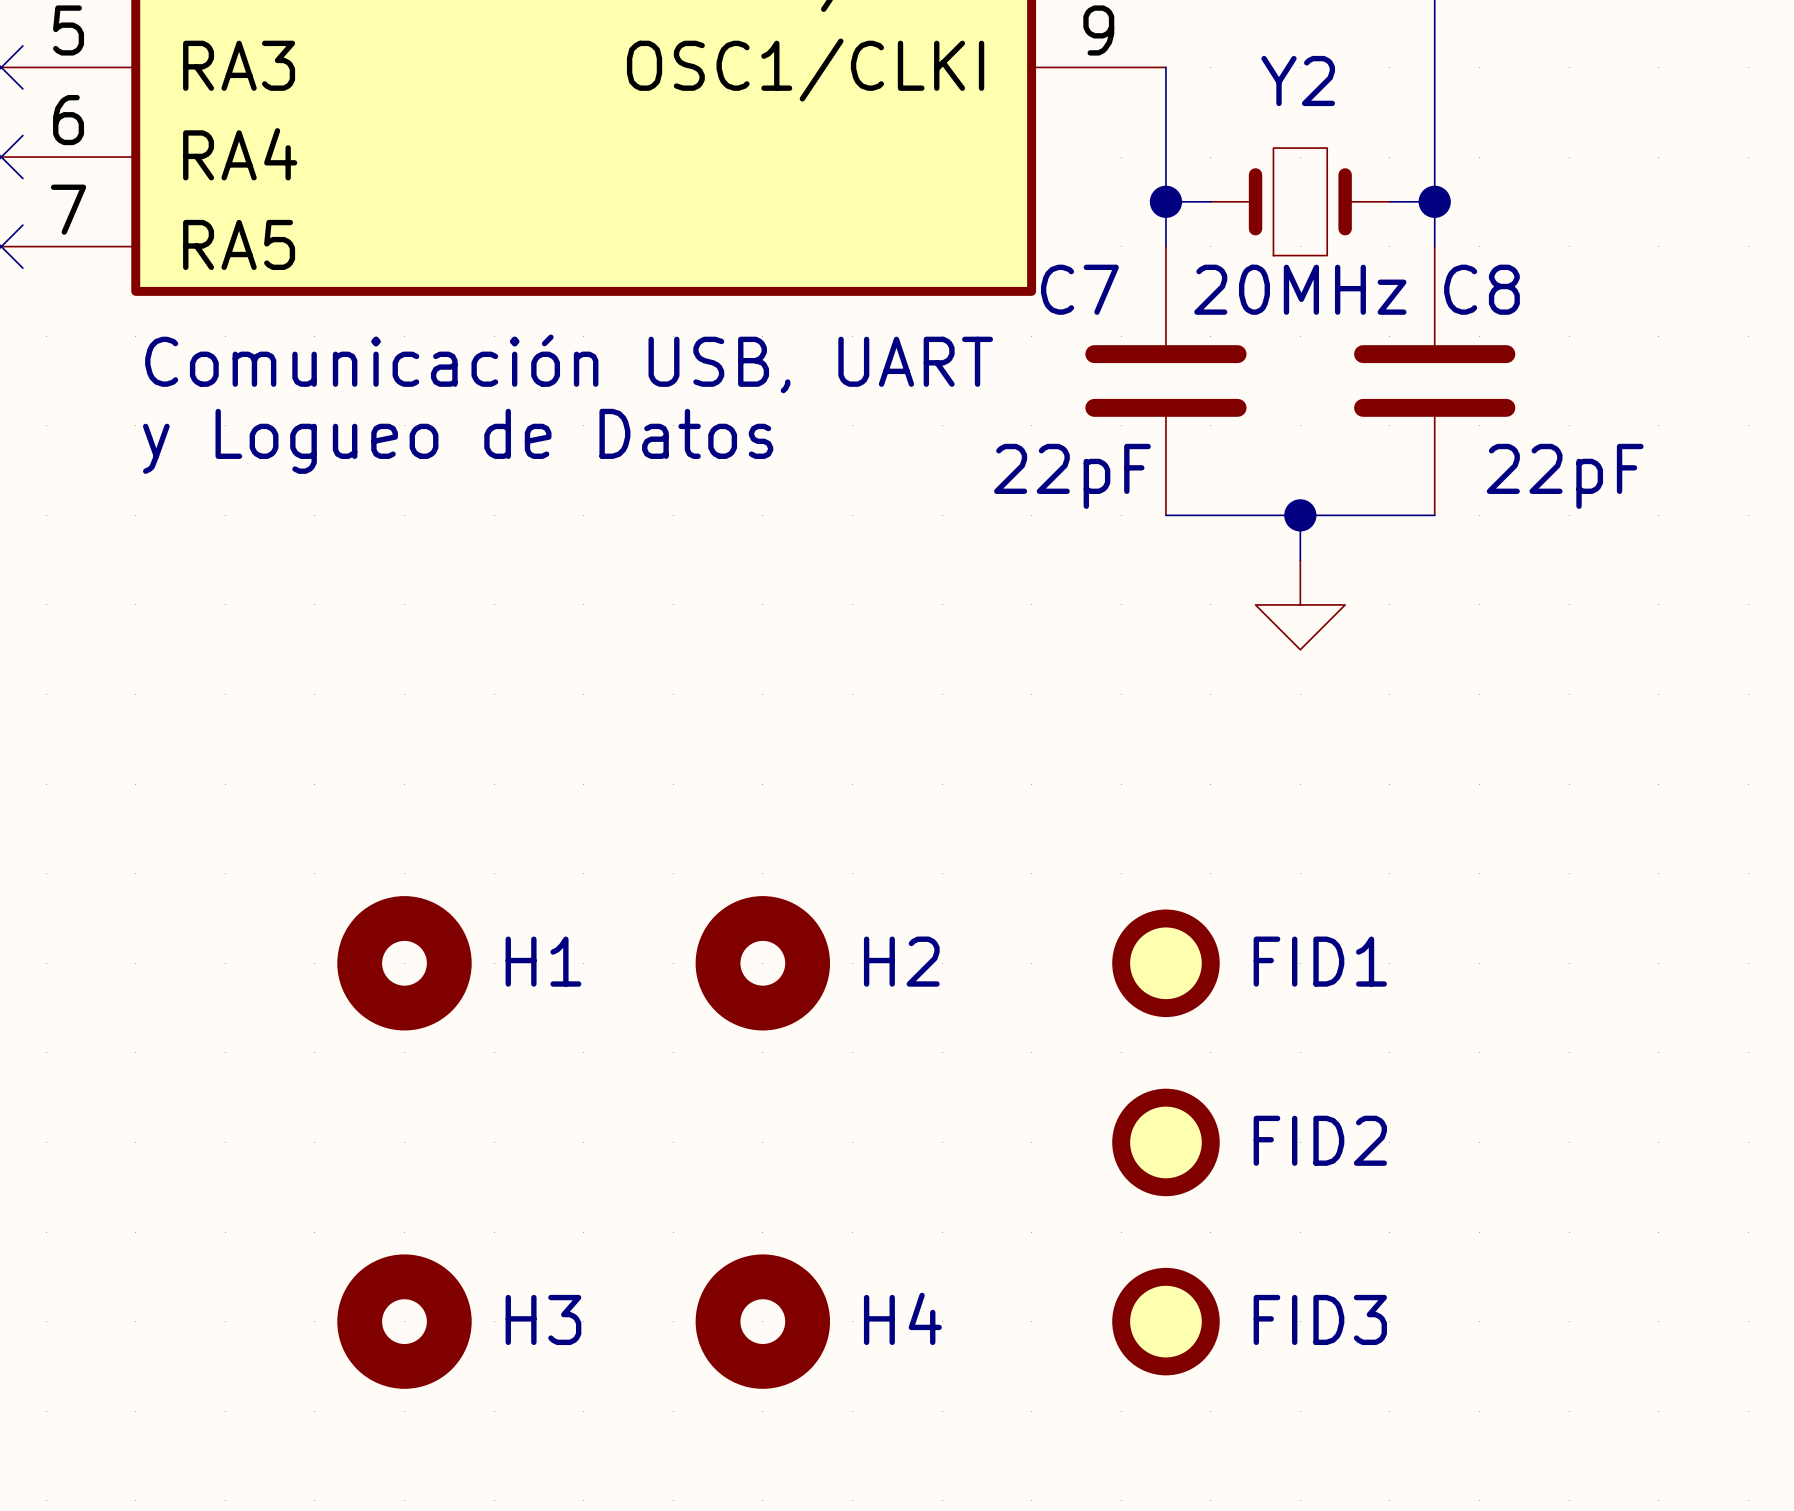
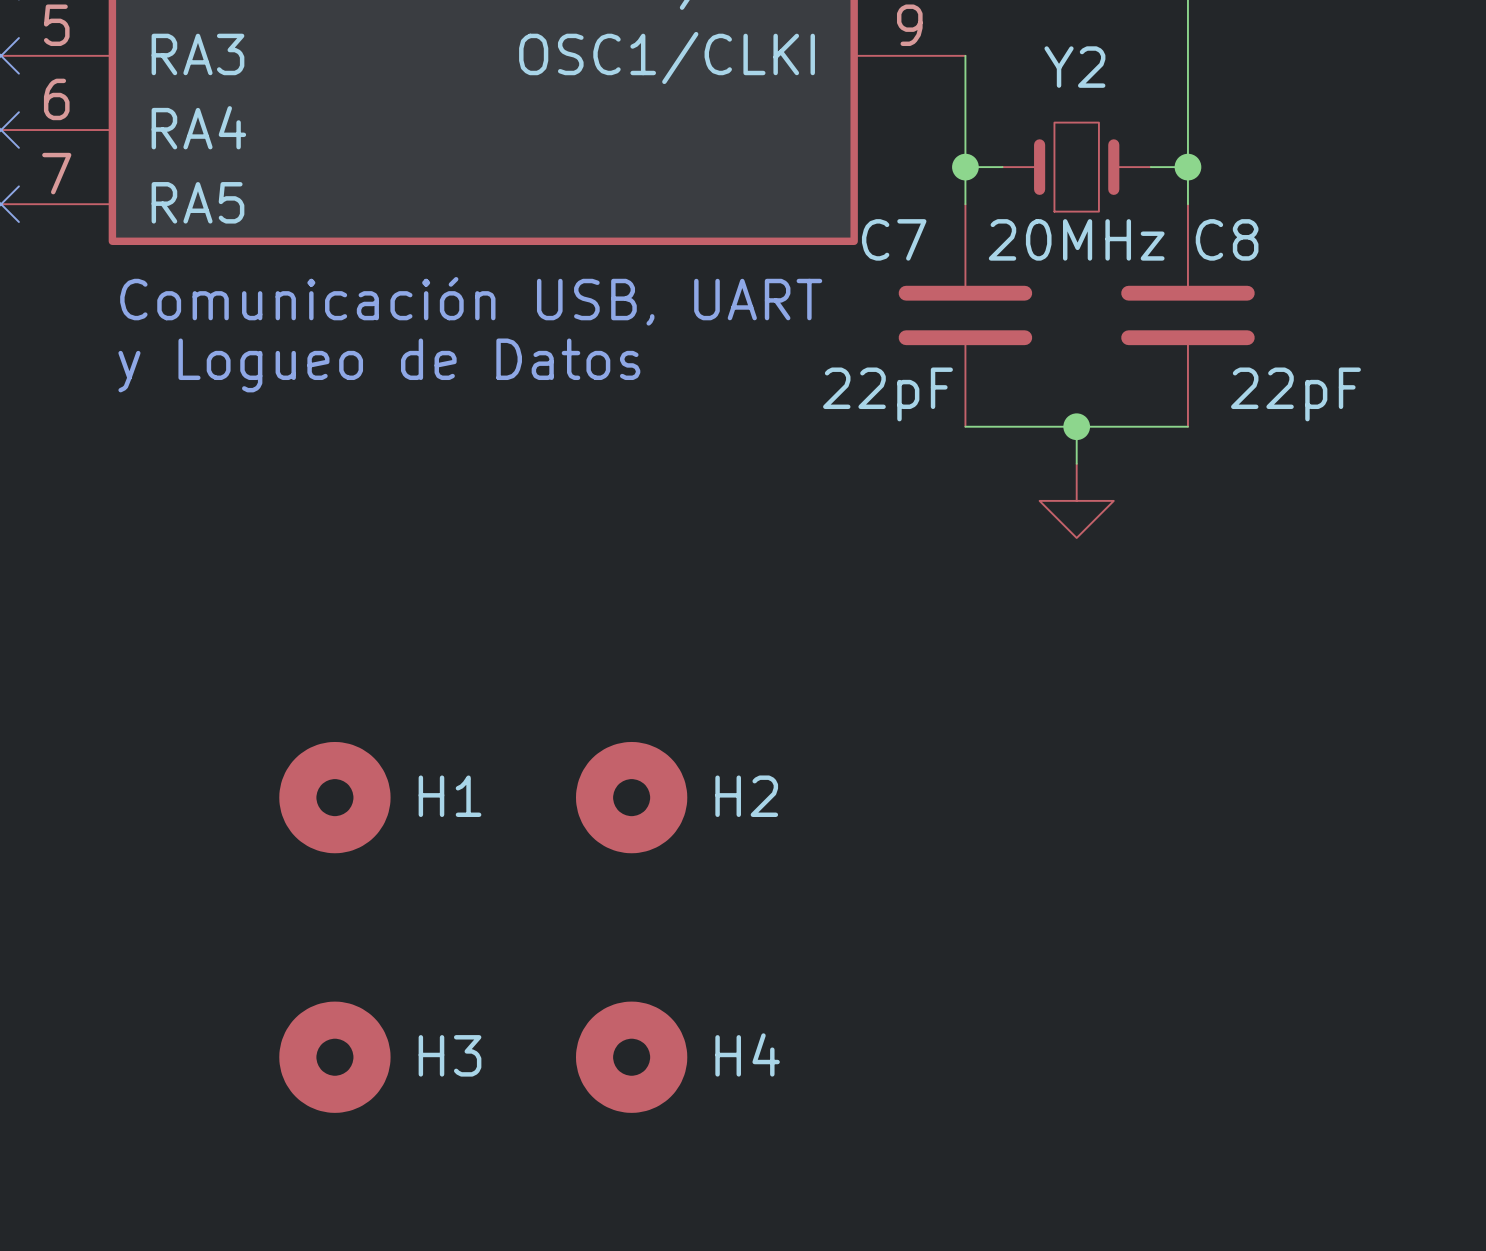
FID1: (1165, 963) -> none
FID2: (1165, 1142) -> none
H3 position: (404, 1321) -> (334, 1057)
H4 position: (762, 1321) -> (631, 1057)
FID3: (1165, 1321) -> none

